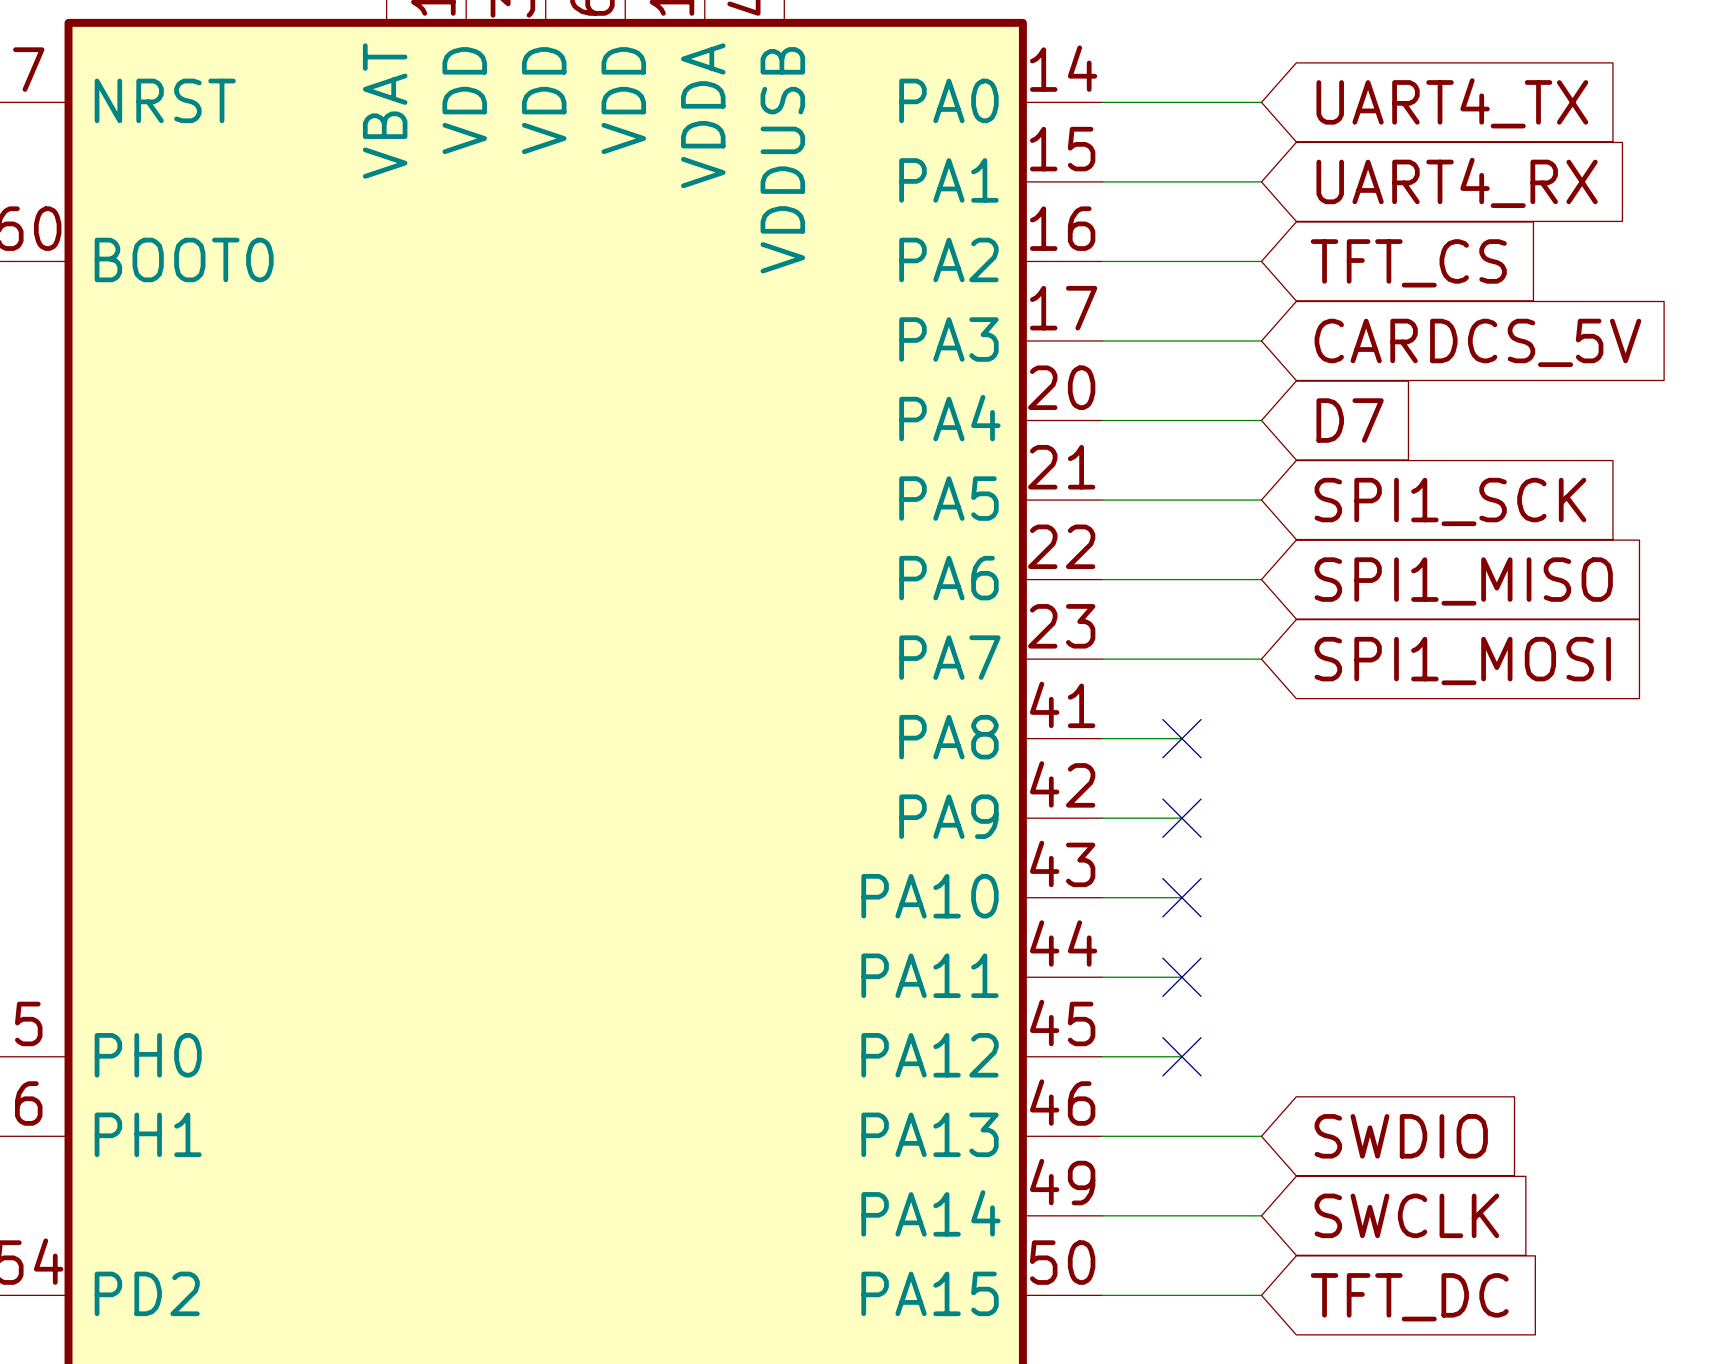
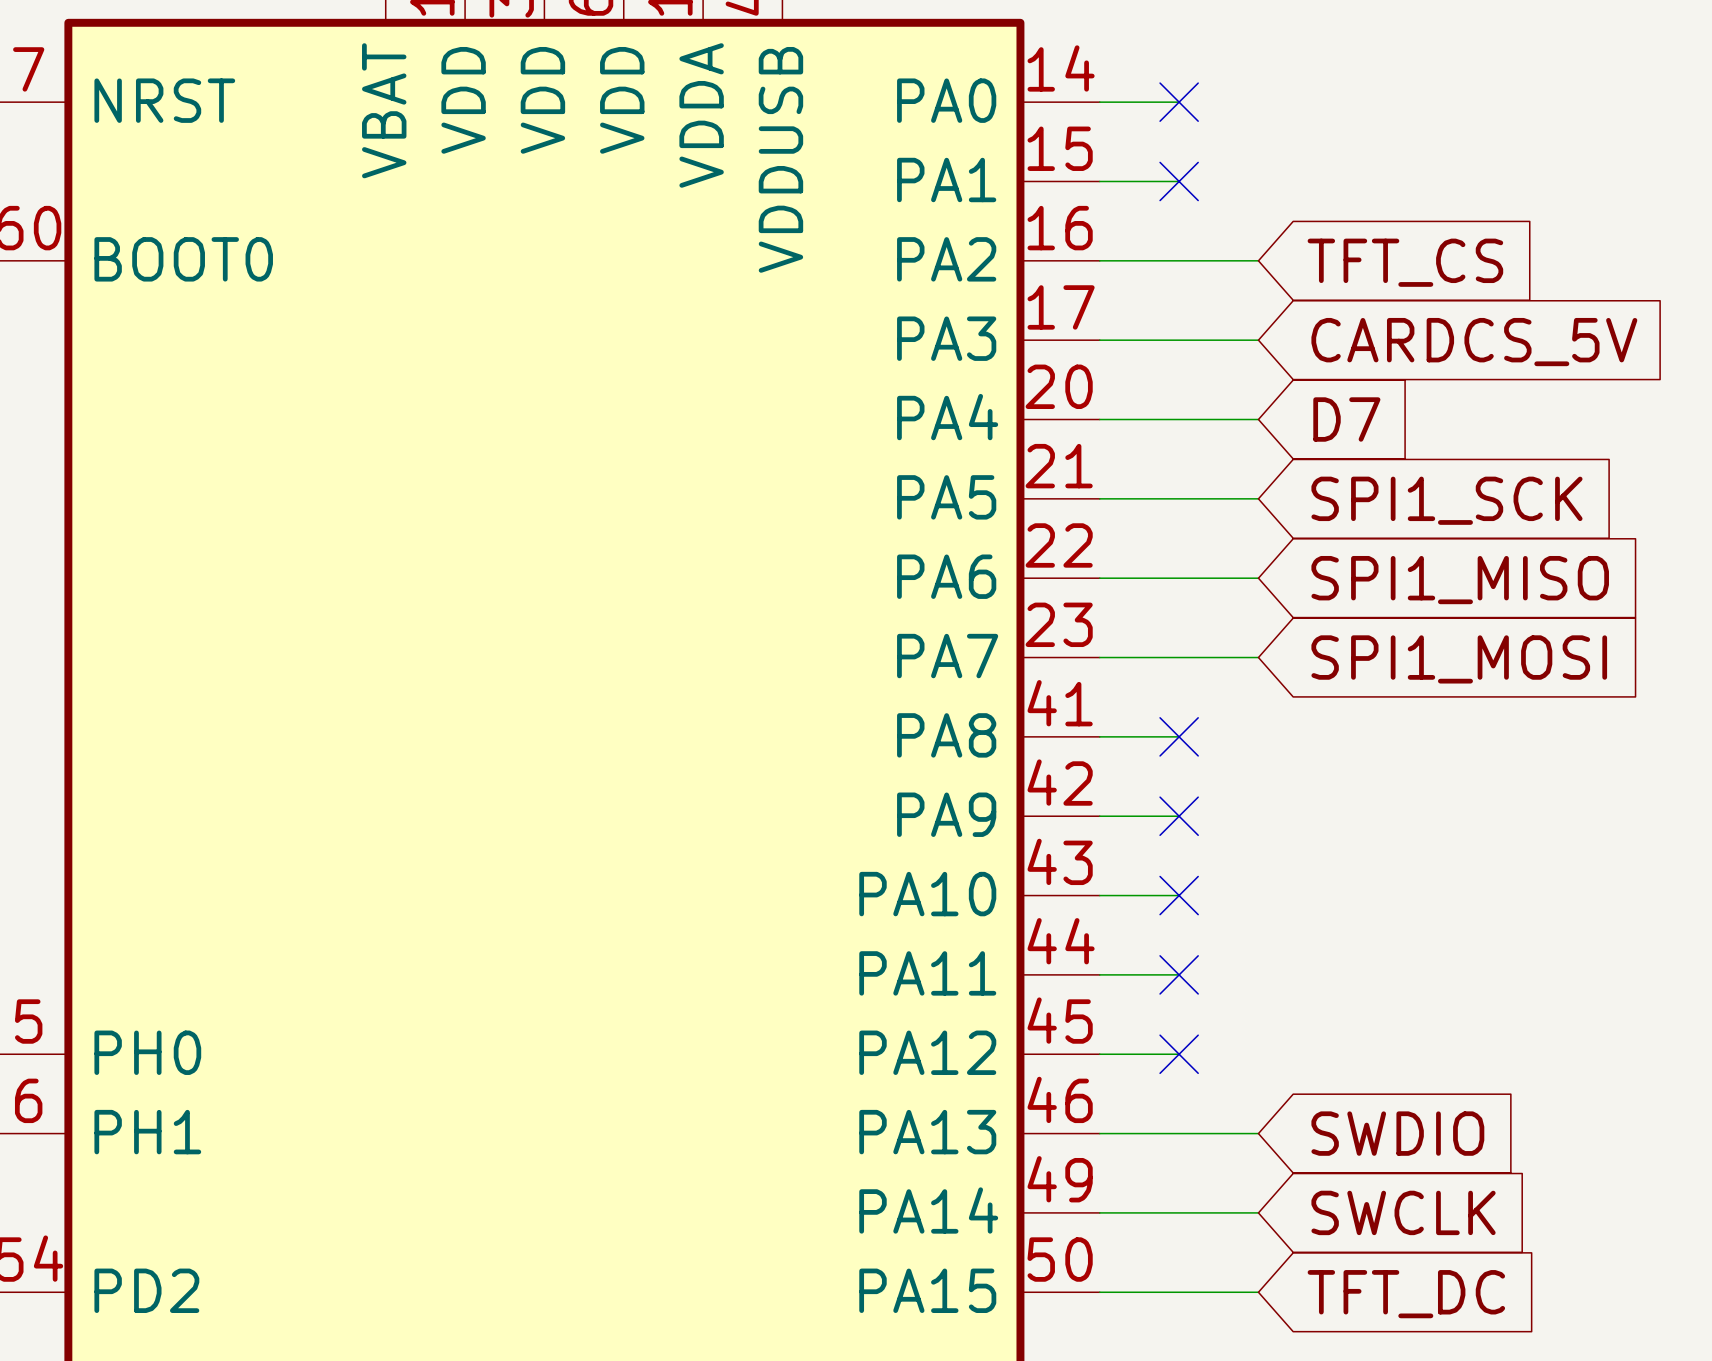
wire: (1181, 102) (1261, 102) -> none
no-connect mark: none -> (1179, 102)
global label: UART4_TX (1452, 103) -> none
wire: (1181, 181) (1261, 181) -> none
no-connect mark: none -> (1179, 181)
global label: UART4_RX (1457, 182) -> none

